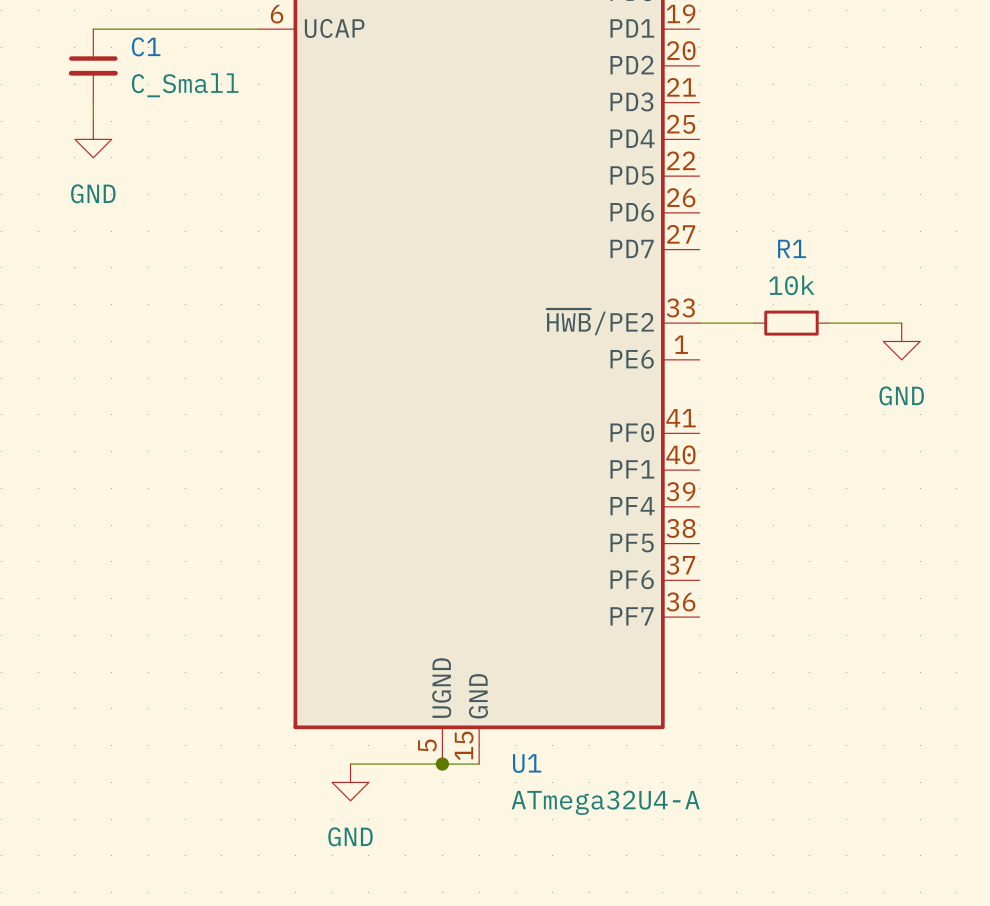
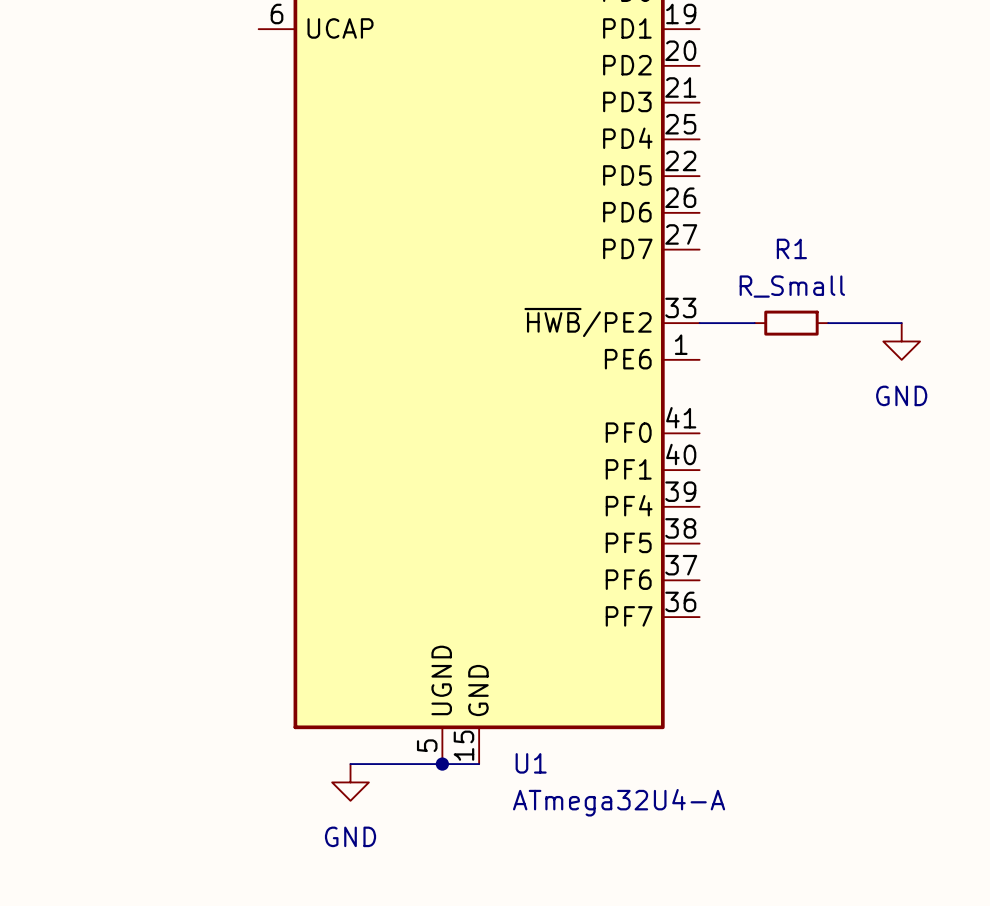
wire: (93, 29) (258, 29) -> none
C1: C_Small (93, 65) -> none
wire: (93, 102) (93, 121) -> none
power symbol: GND (93, 139) -> none
R1 value: 10k (791, 285) -> R_Small (792, 286)

